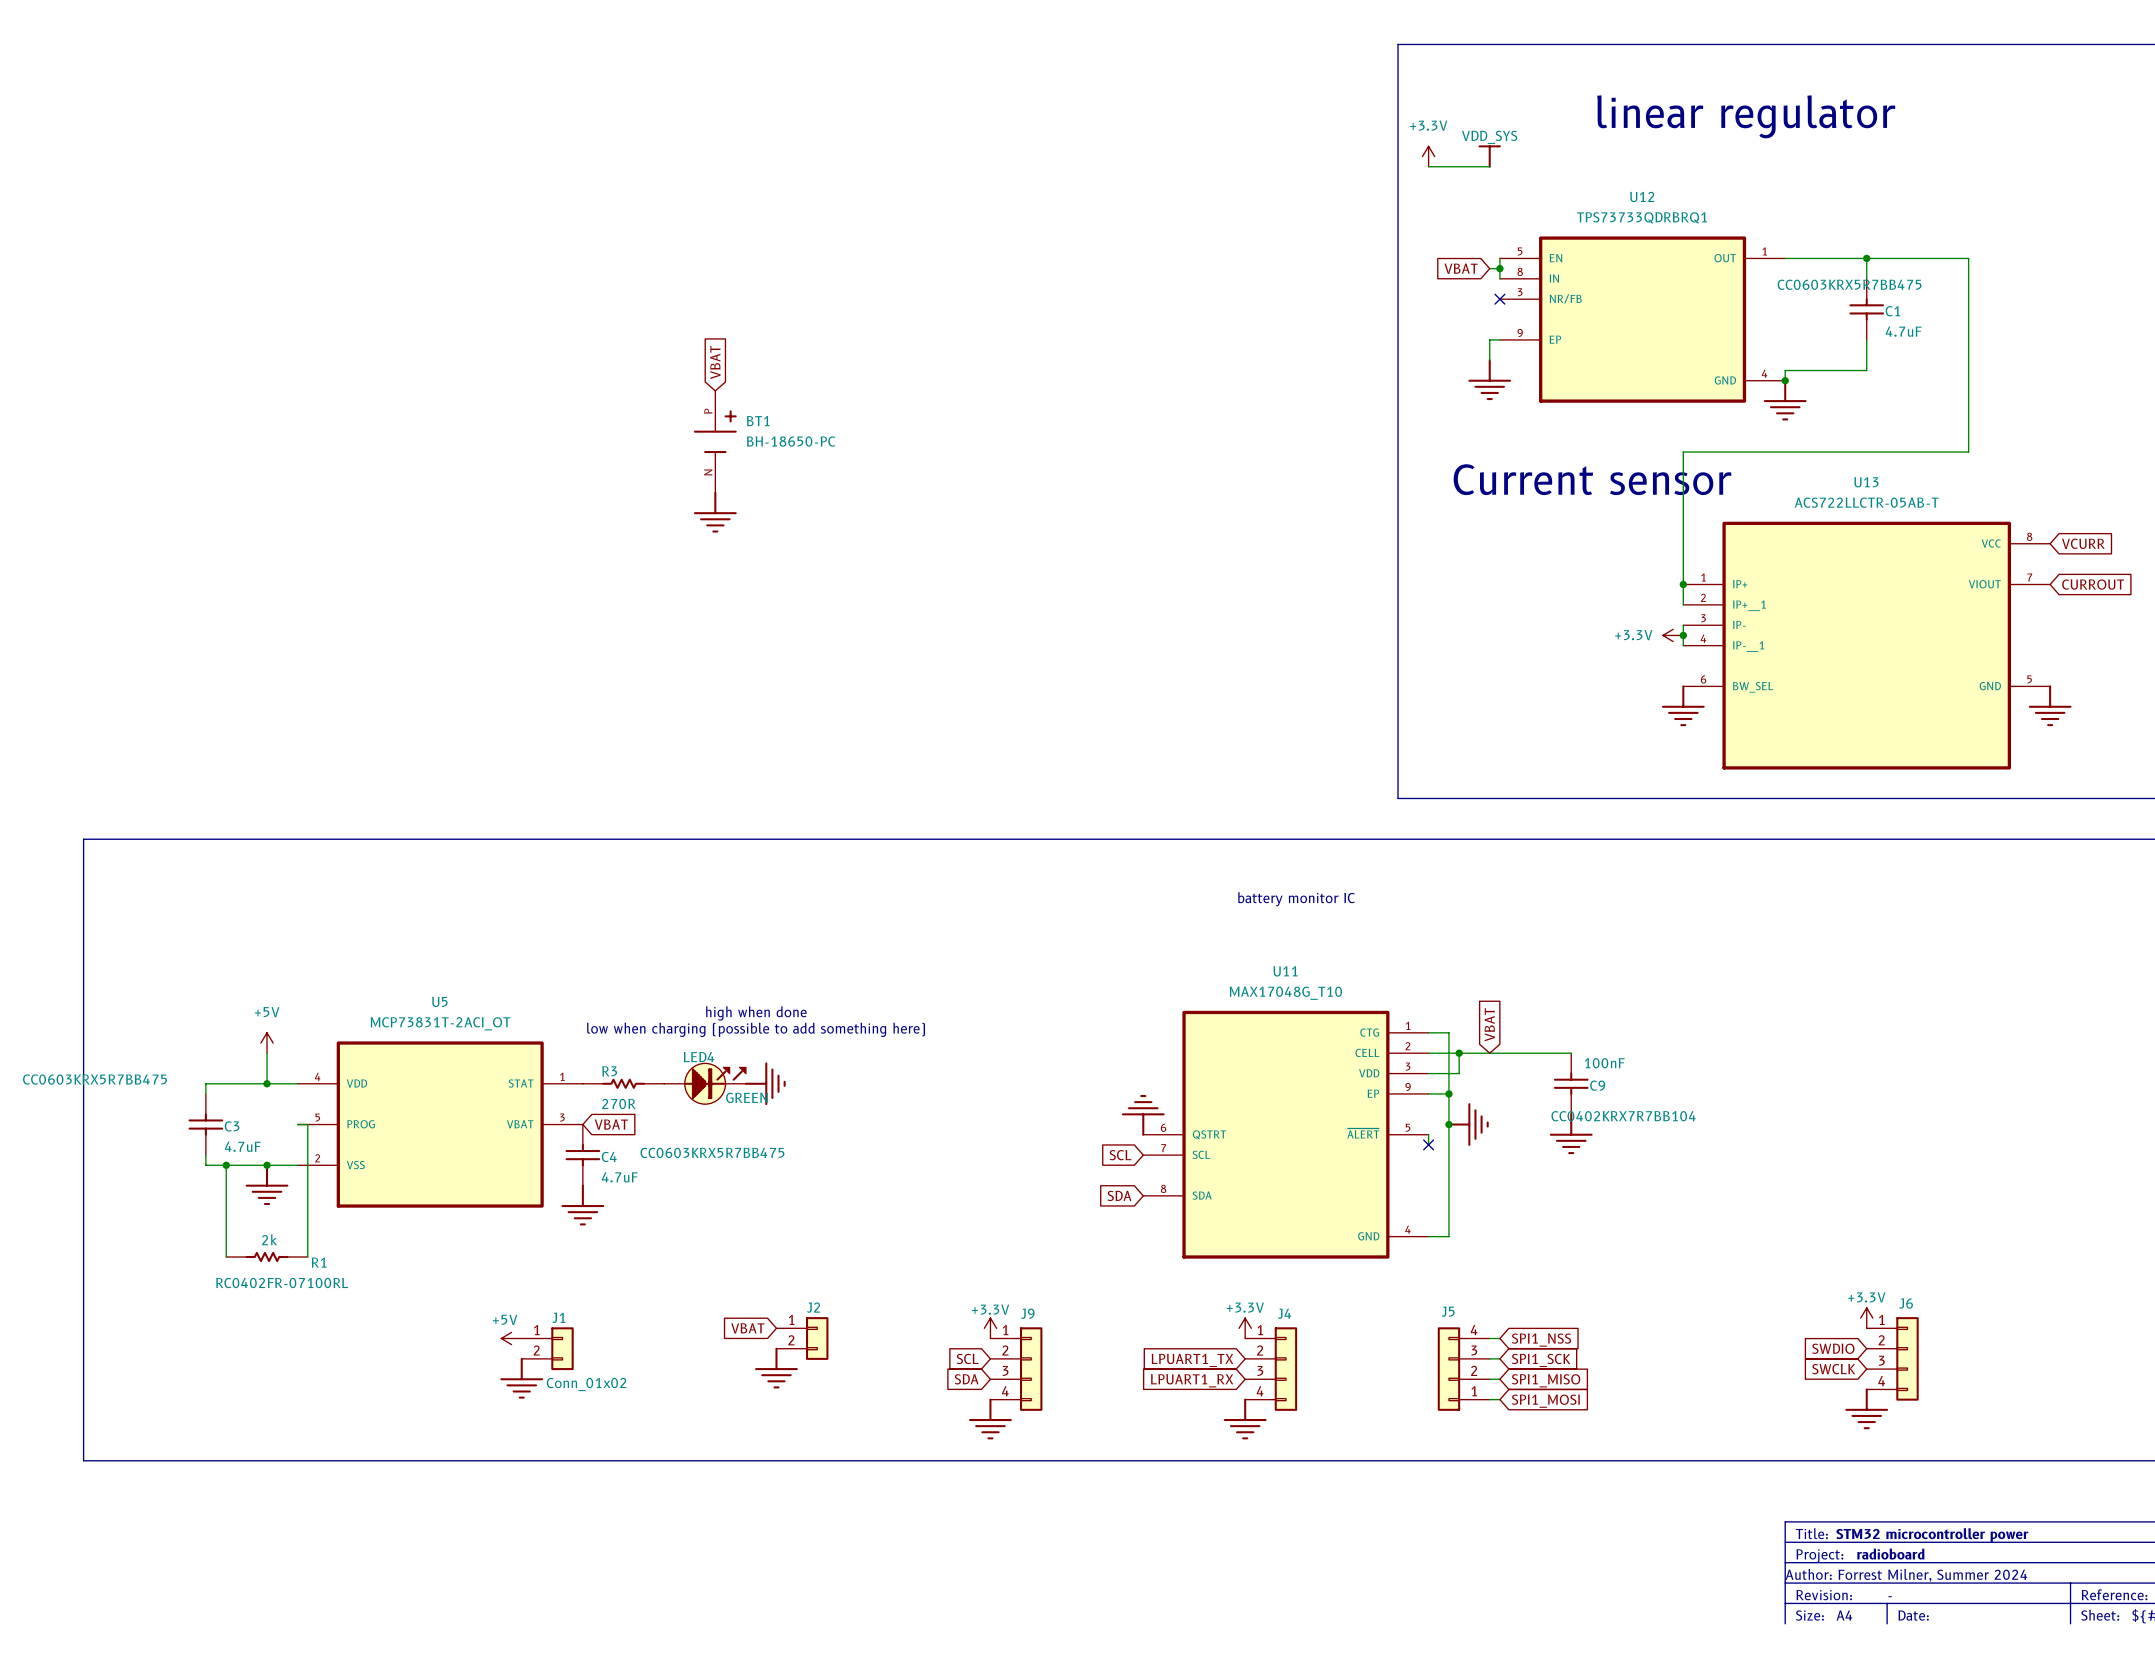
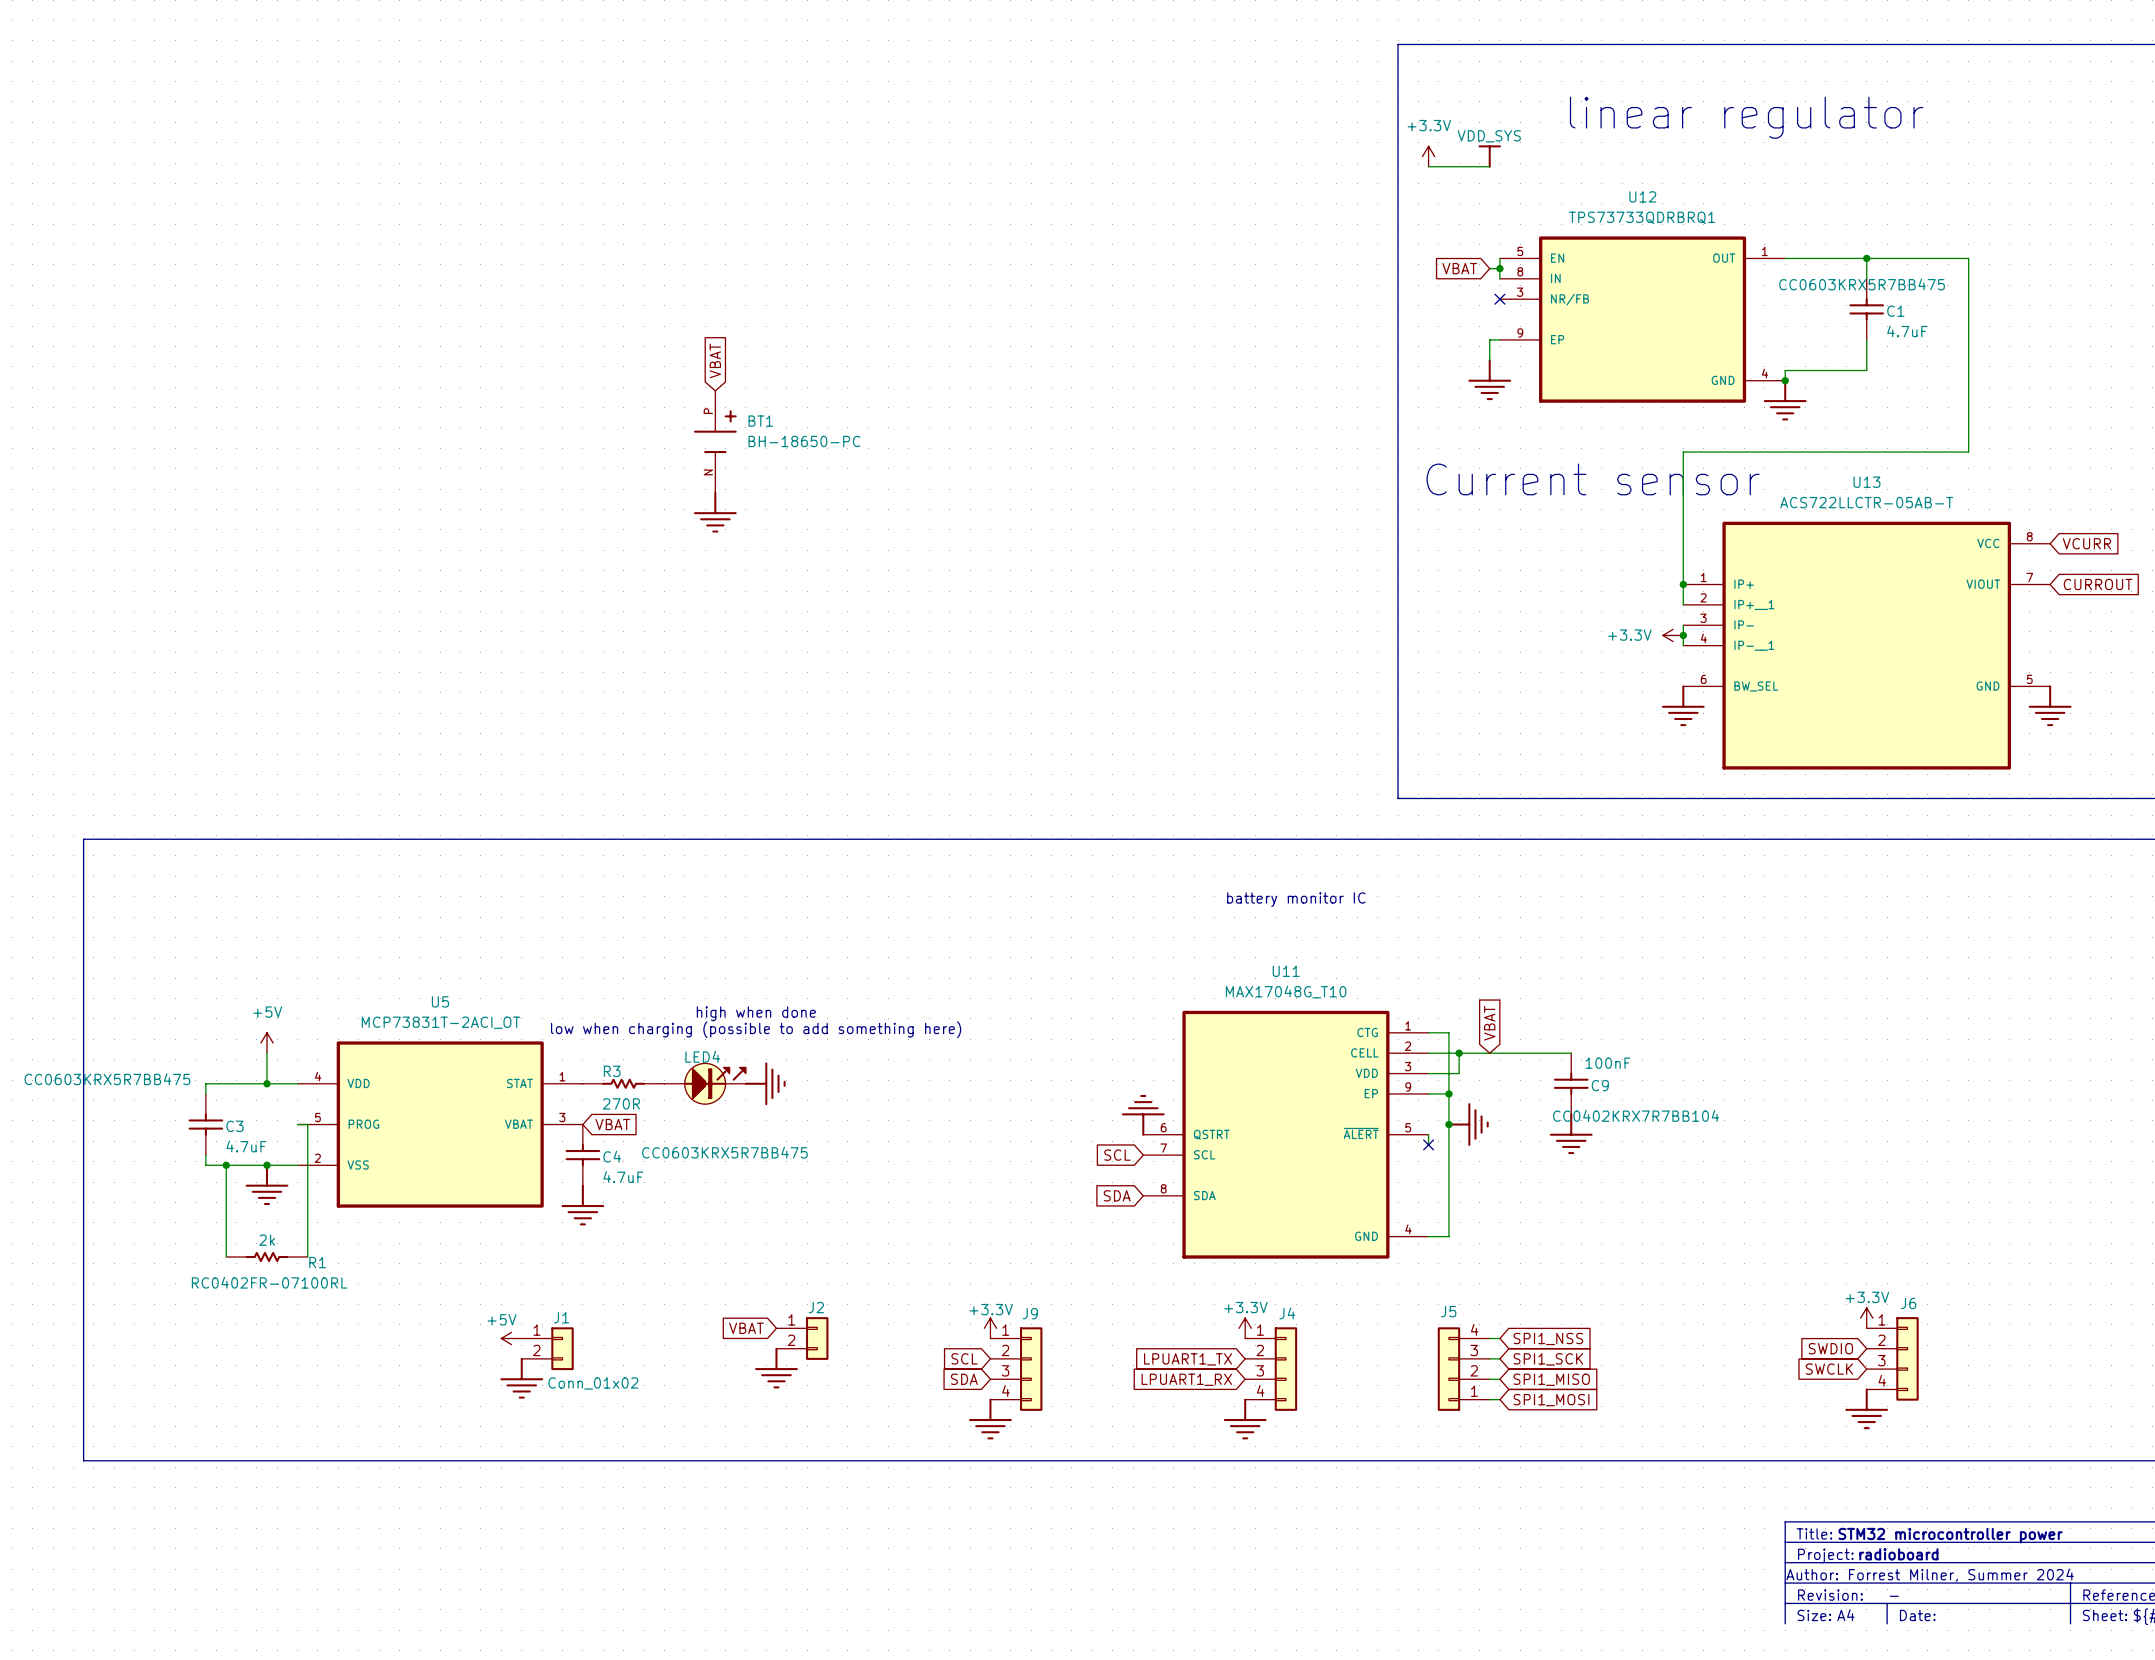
LED4 text: GREEN (746, 1097) -> none

